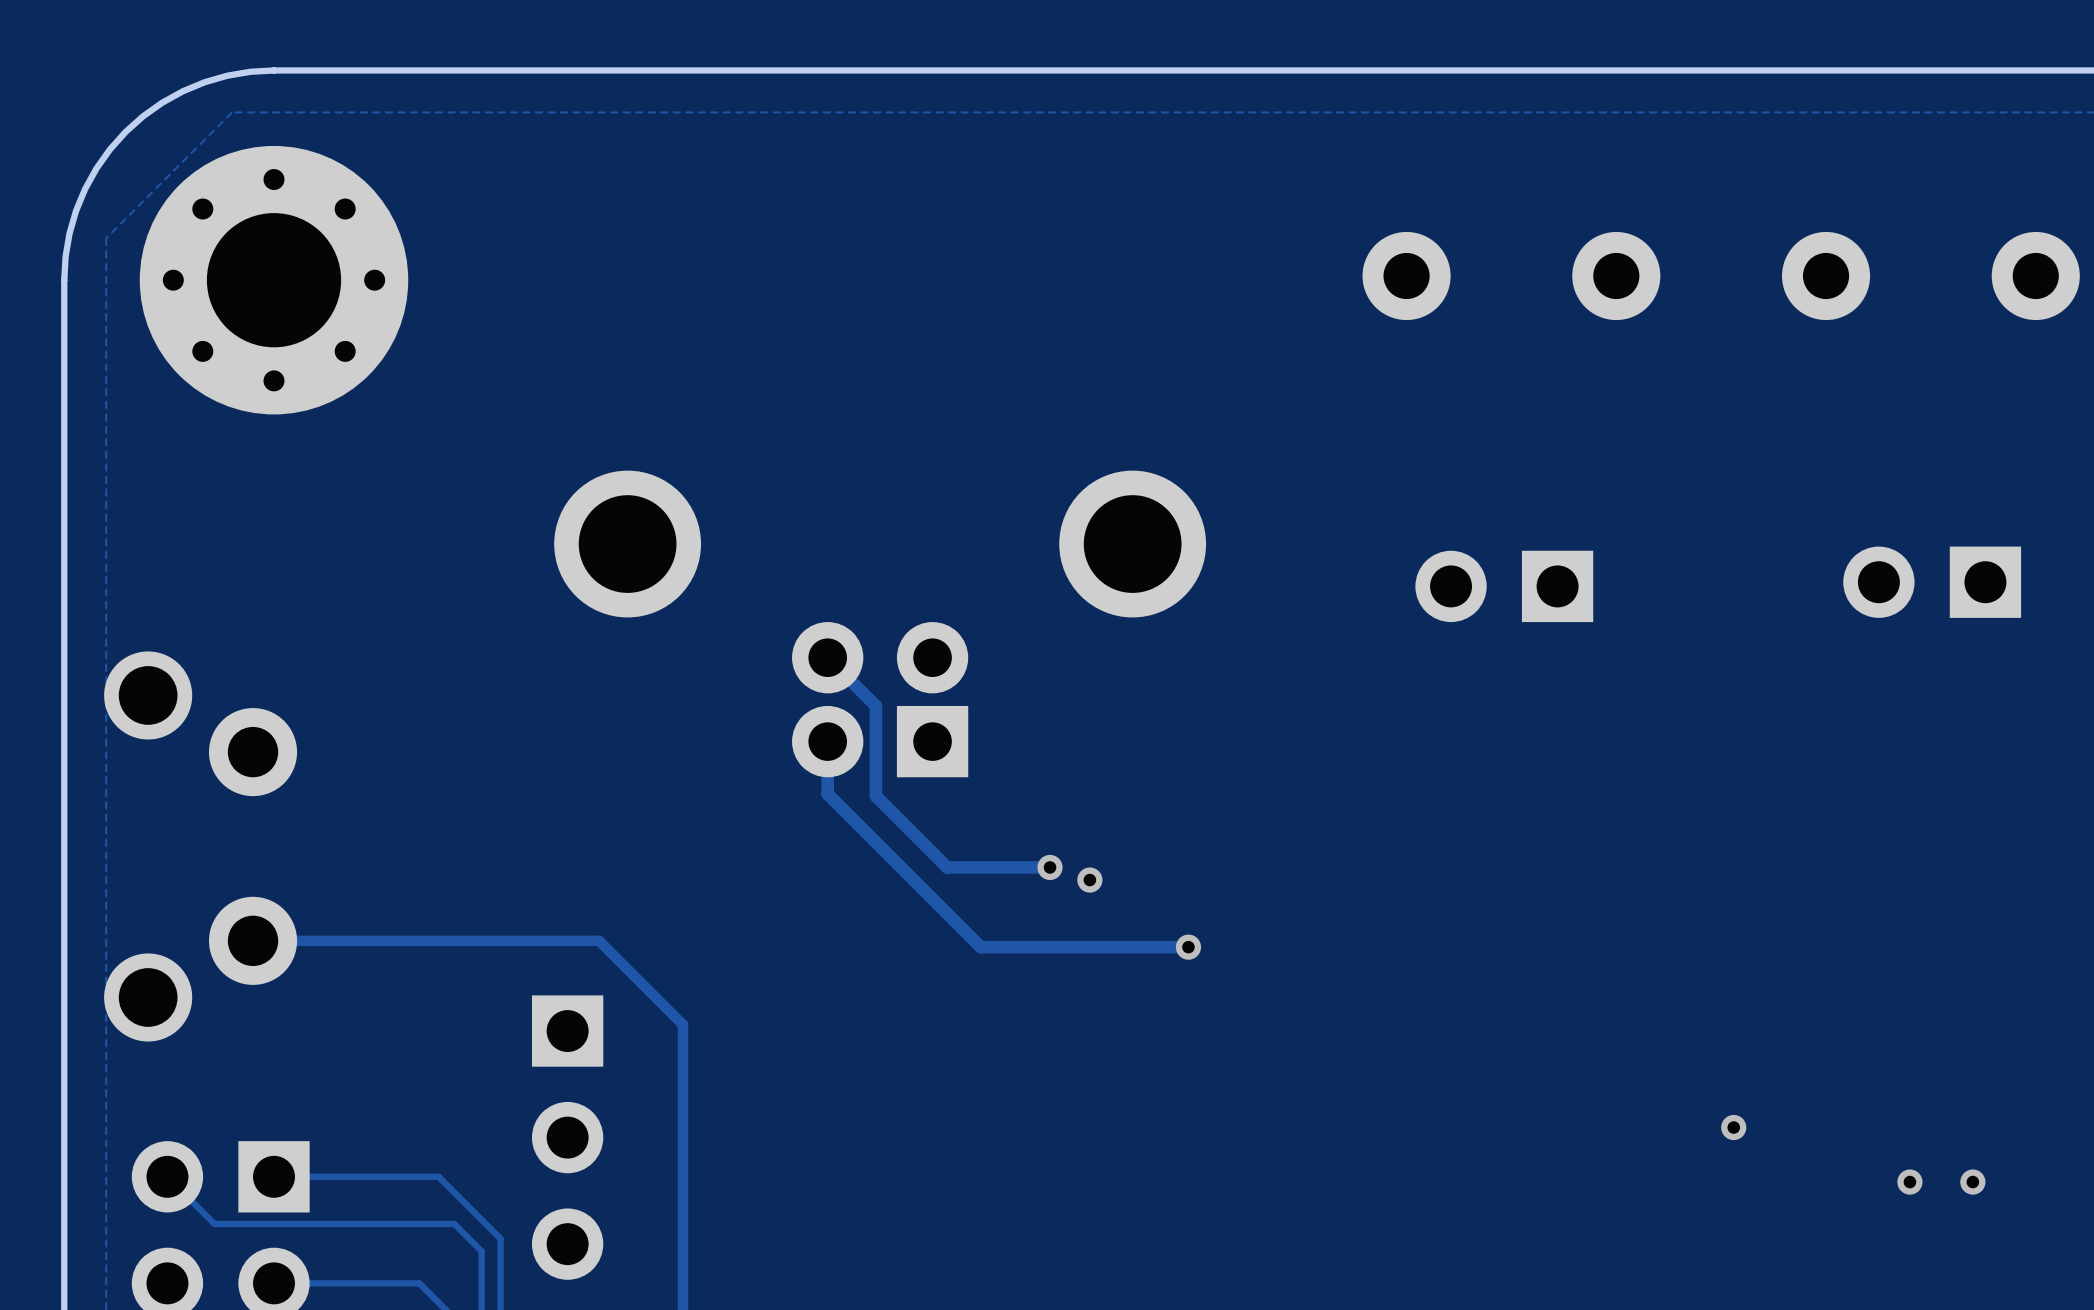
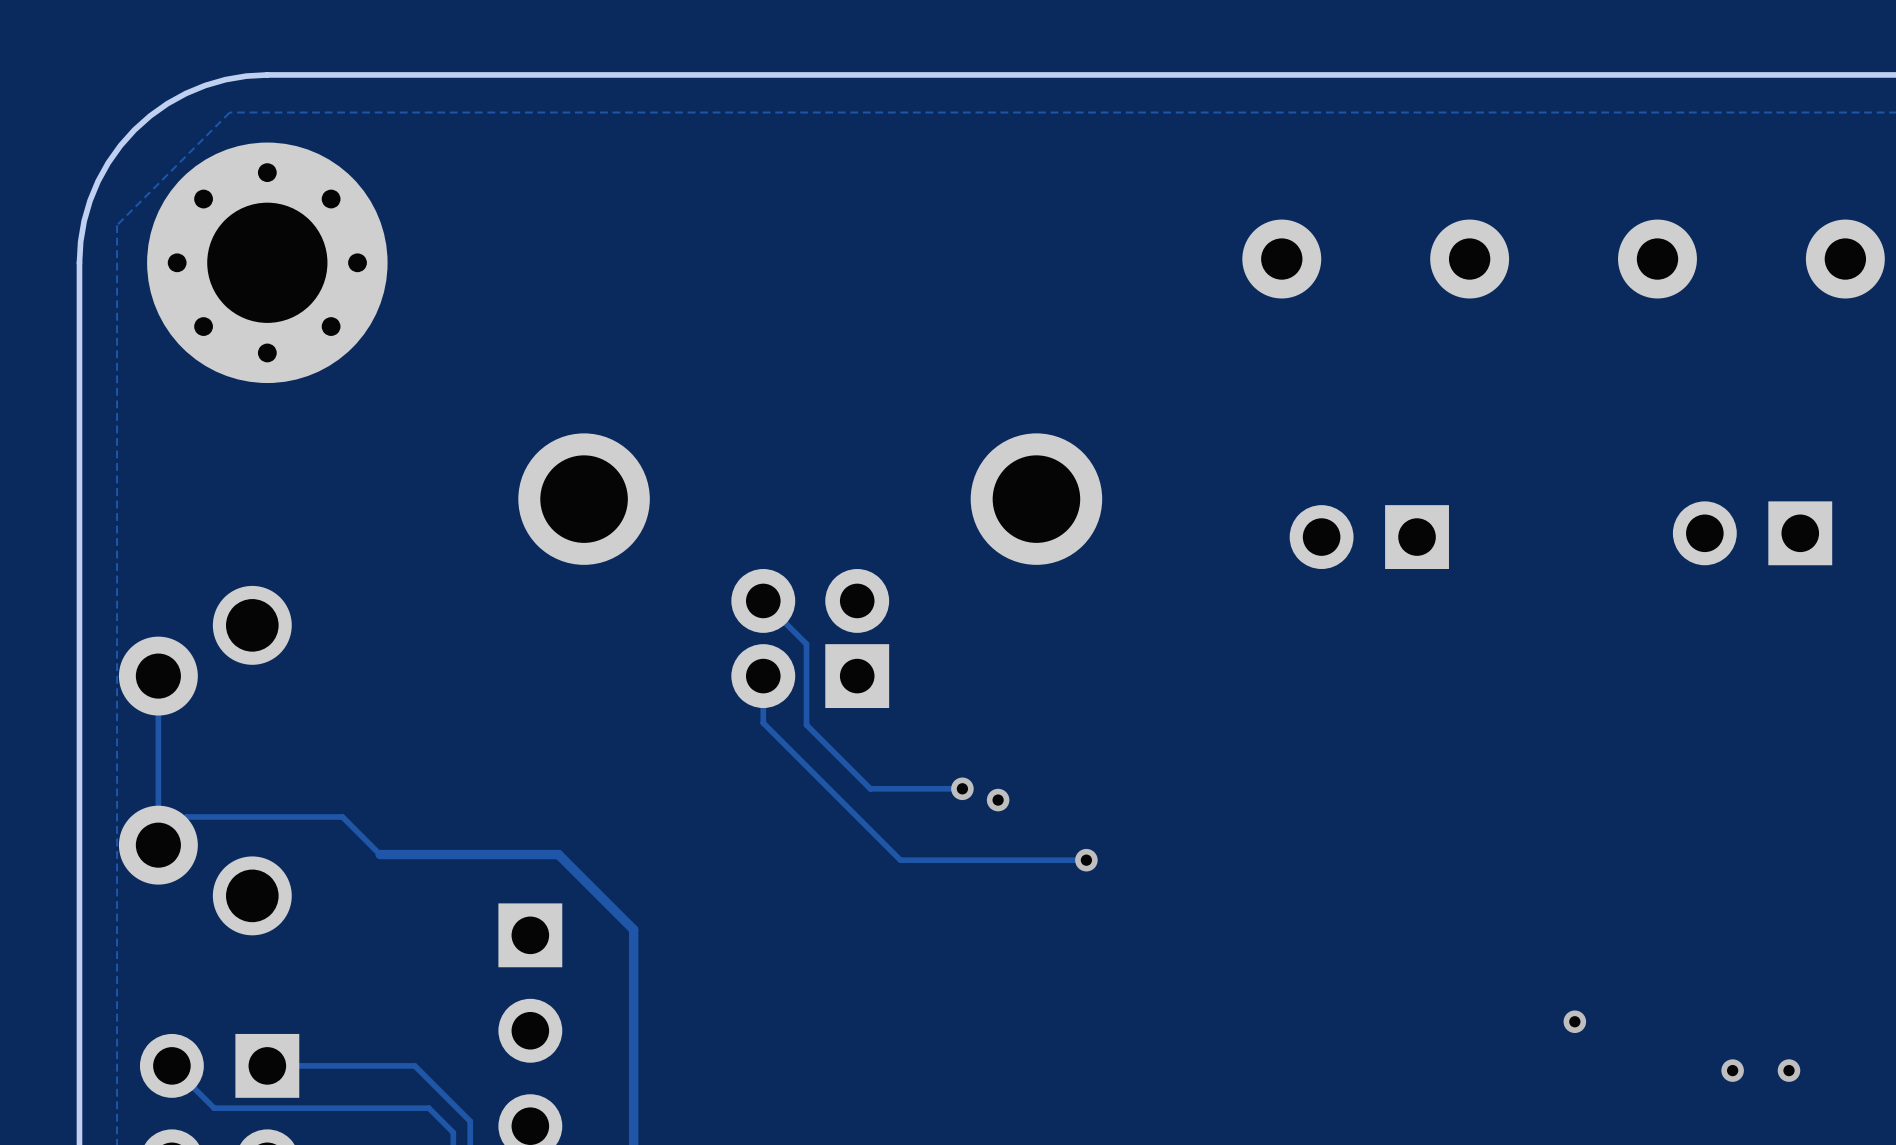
track width: thick (827, 657) (875, 705) (875, 796) (947, 867) (1050, 867) -> thin (763, 600) (806, 644) (806, 724) (870, 788) (962, 788)
track width: thick (827, 741) (827, 794) (980, 947) (1188, 947) -> thin (763, 676) (763, 723) (900, 860) (1086, 860)
part rotation: 0° (200, 846) -> 180° (205, 760)
track: (399, 940) (253, 940) -> (380, 854) (342, 816) (186, 816) (158, 845) (158, 676)

